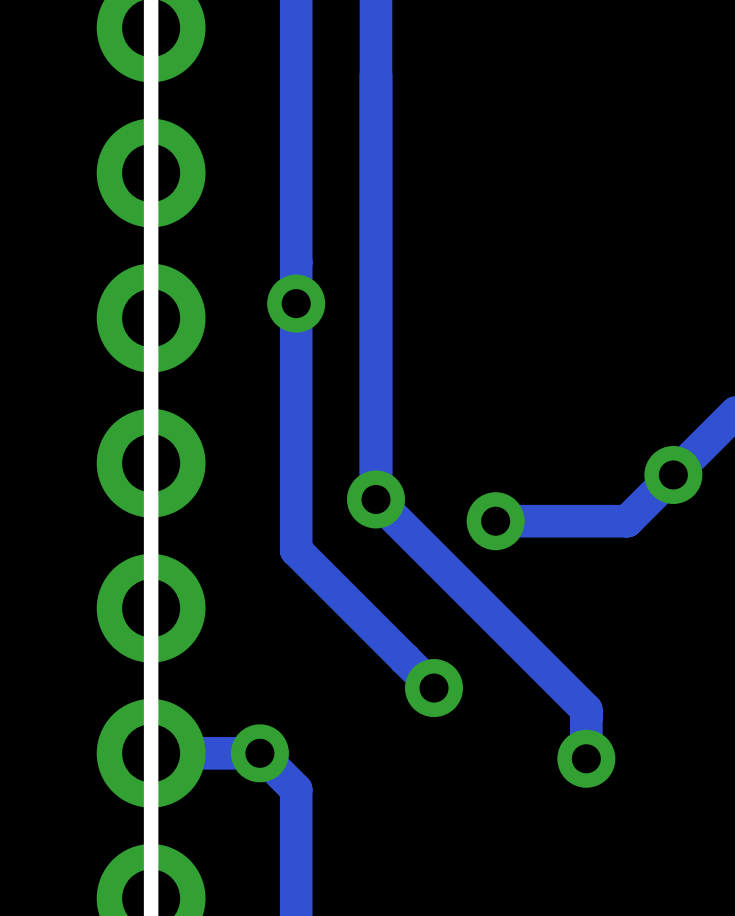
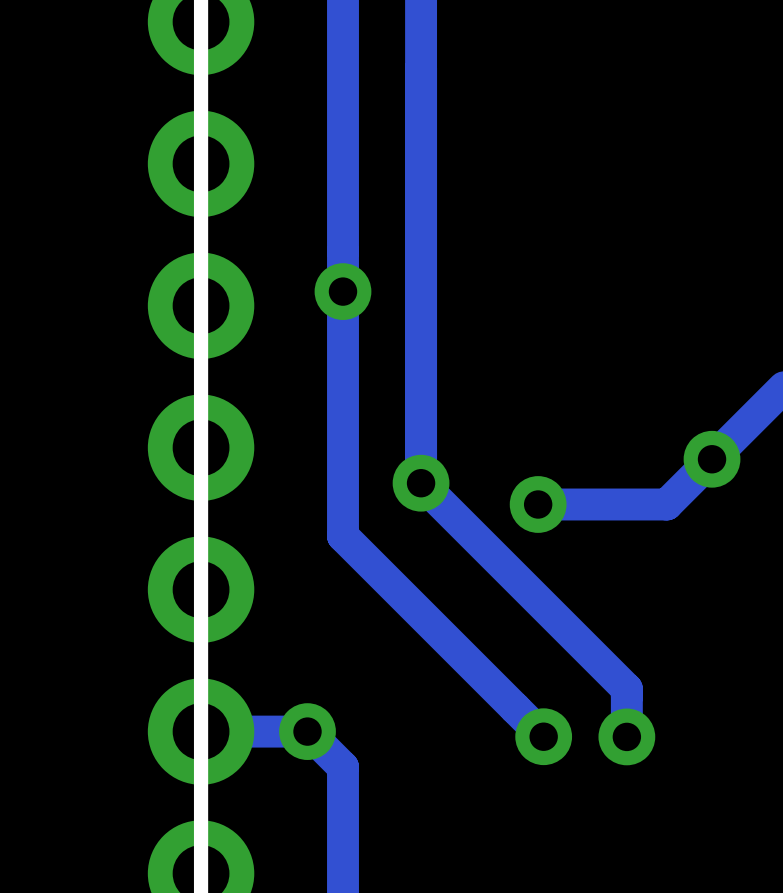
track: (296, 550) (434, 688) -> (342, 532) (342, 536) (543, 736)
via position: (434, 688) -> (543, 736)

